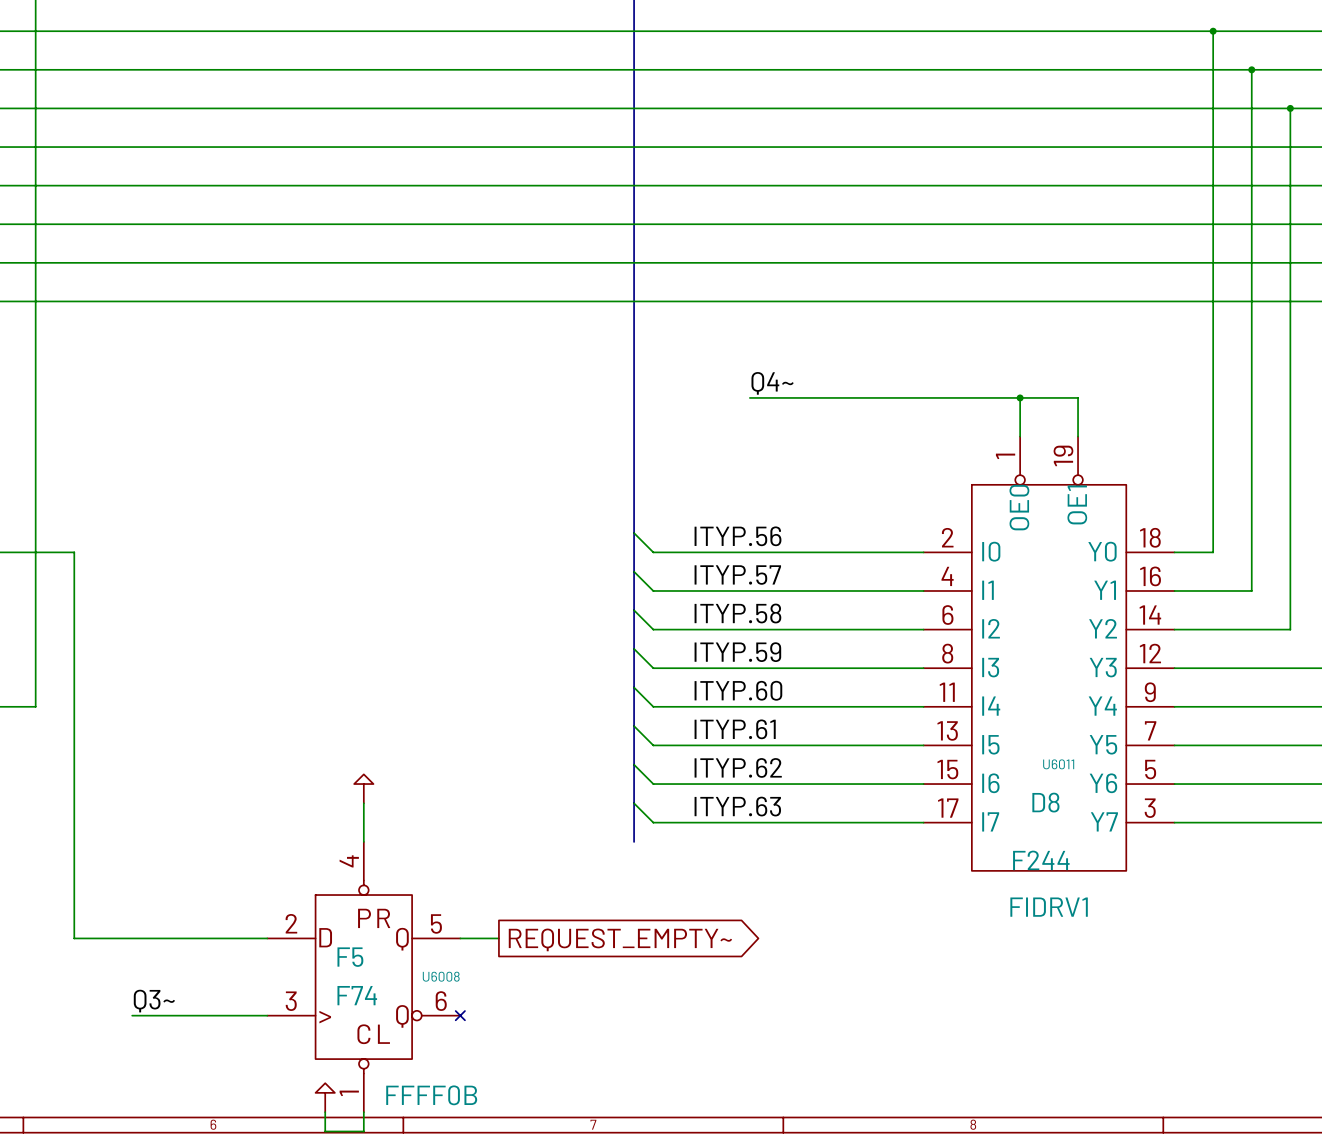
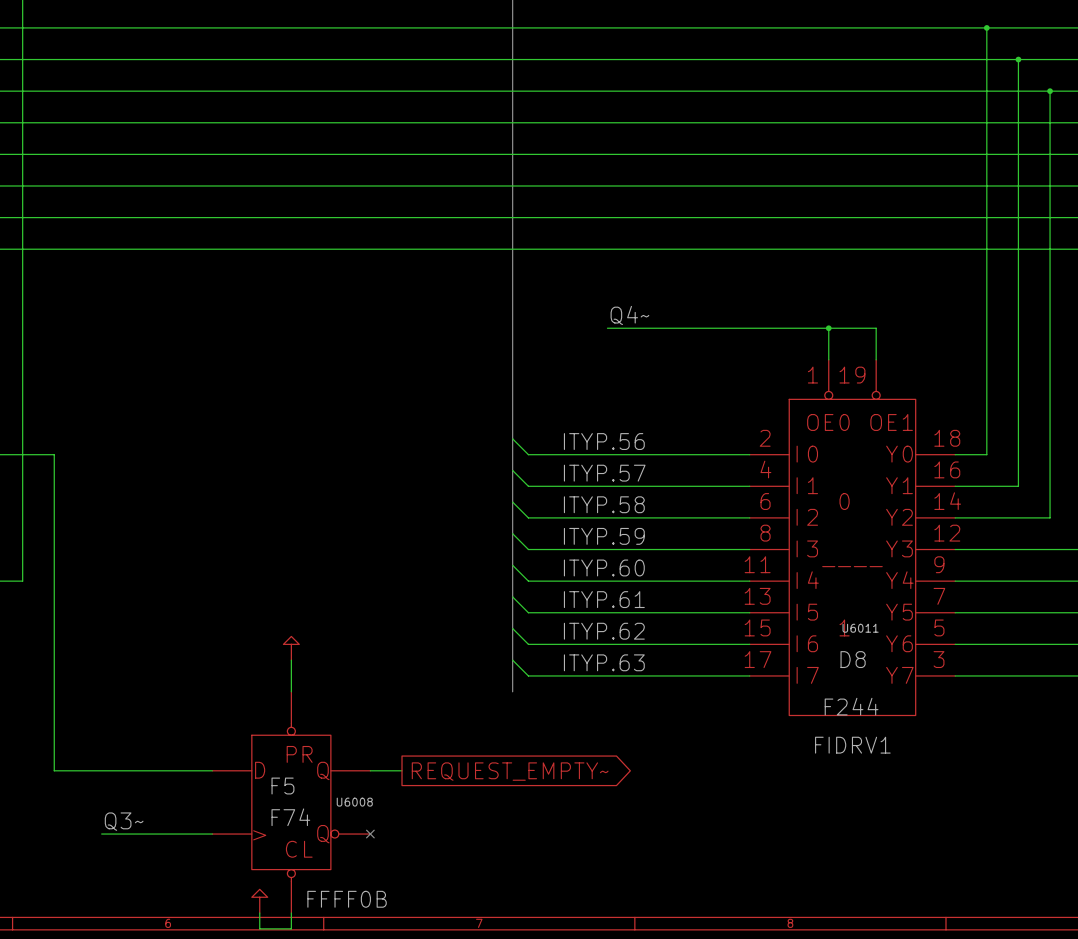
U6011 symbol: [923, 436, 1175, 871] -> [749, 359, 956, 716]
U6008 pin number: 4 (349, 861) -> none
U6008 pin number: 2 (291, 923) -> none
U6008 pin number: 5 (436, 923) -> none
U6008 pin number: 3 (291, 1001) -> none
U6008 pin number: 6 (441, 1001) -> none
U6008 pin number: 1 (349, 1093) -> none

